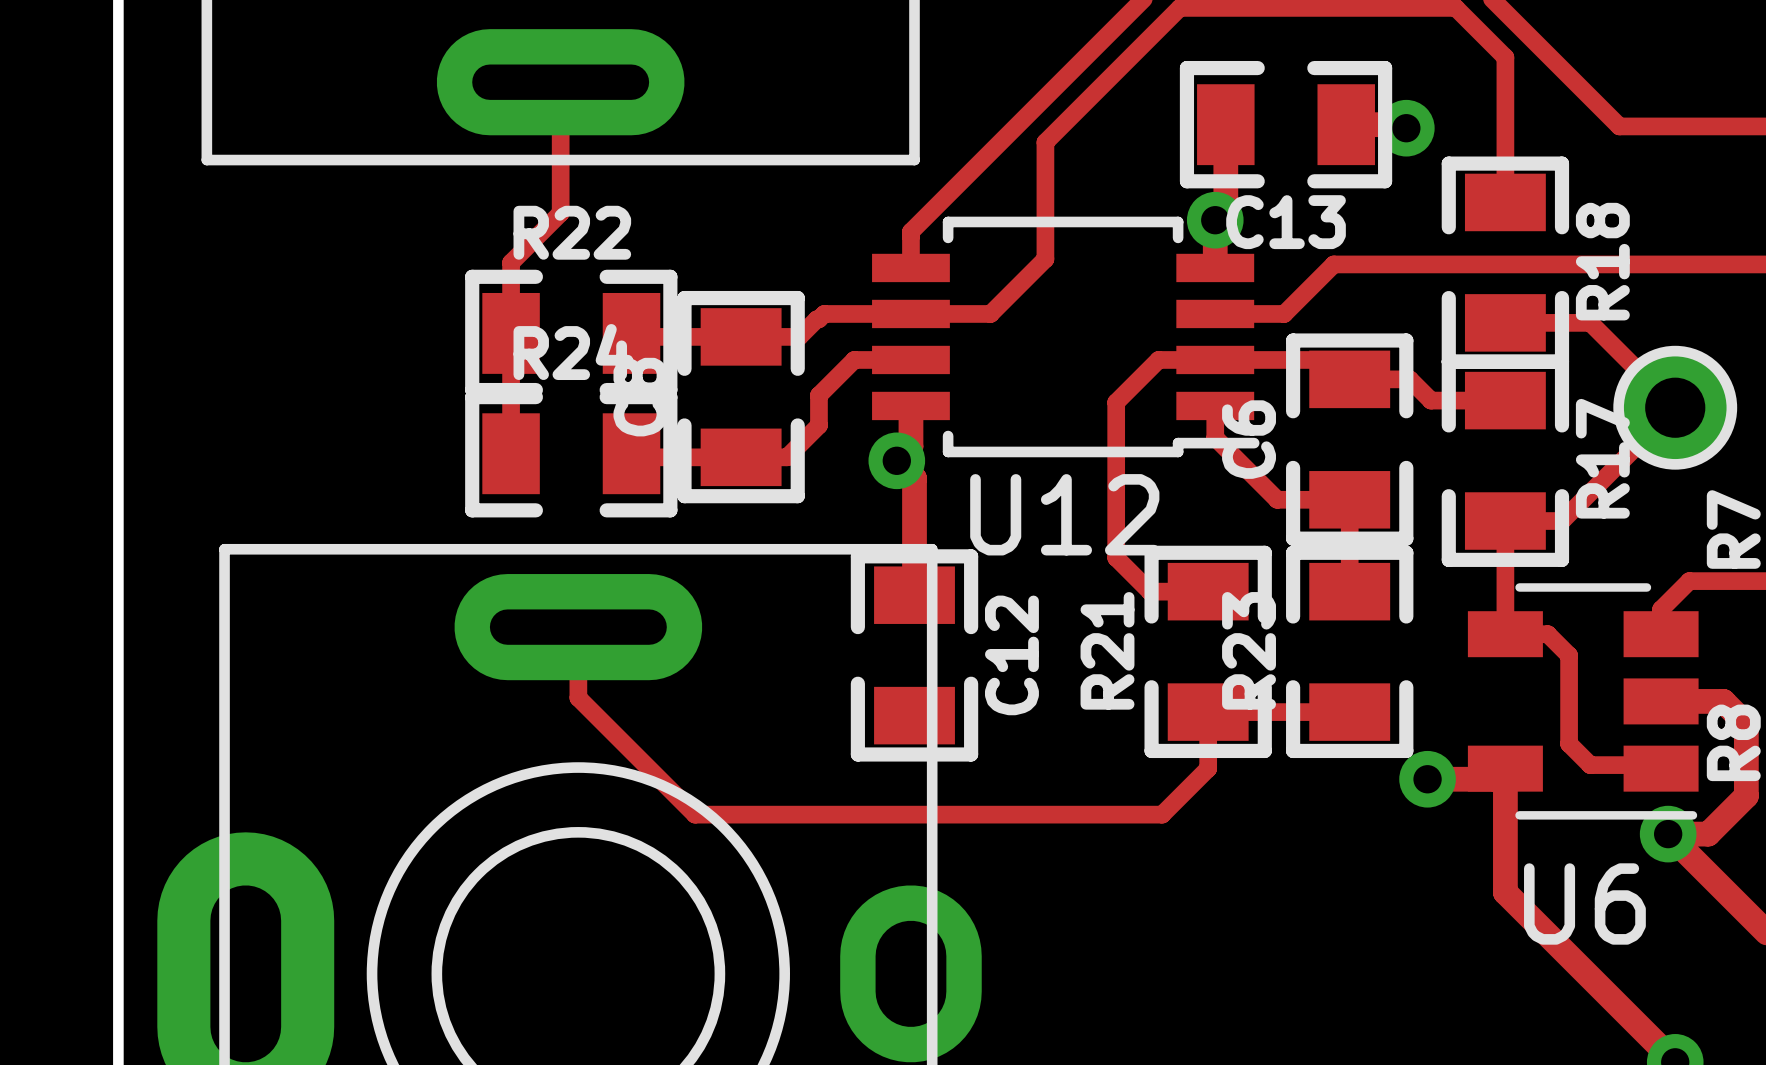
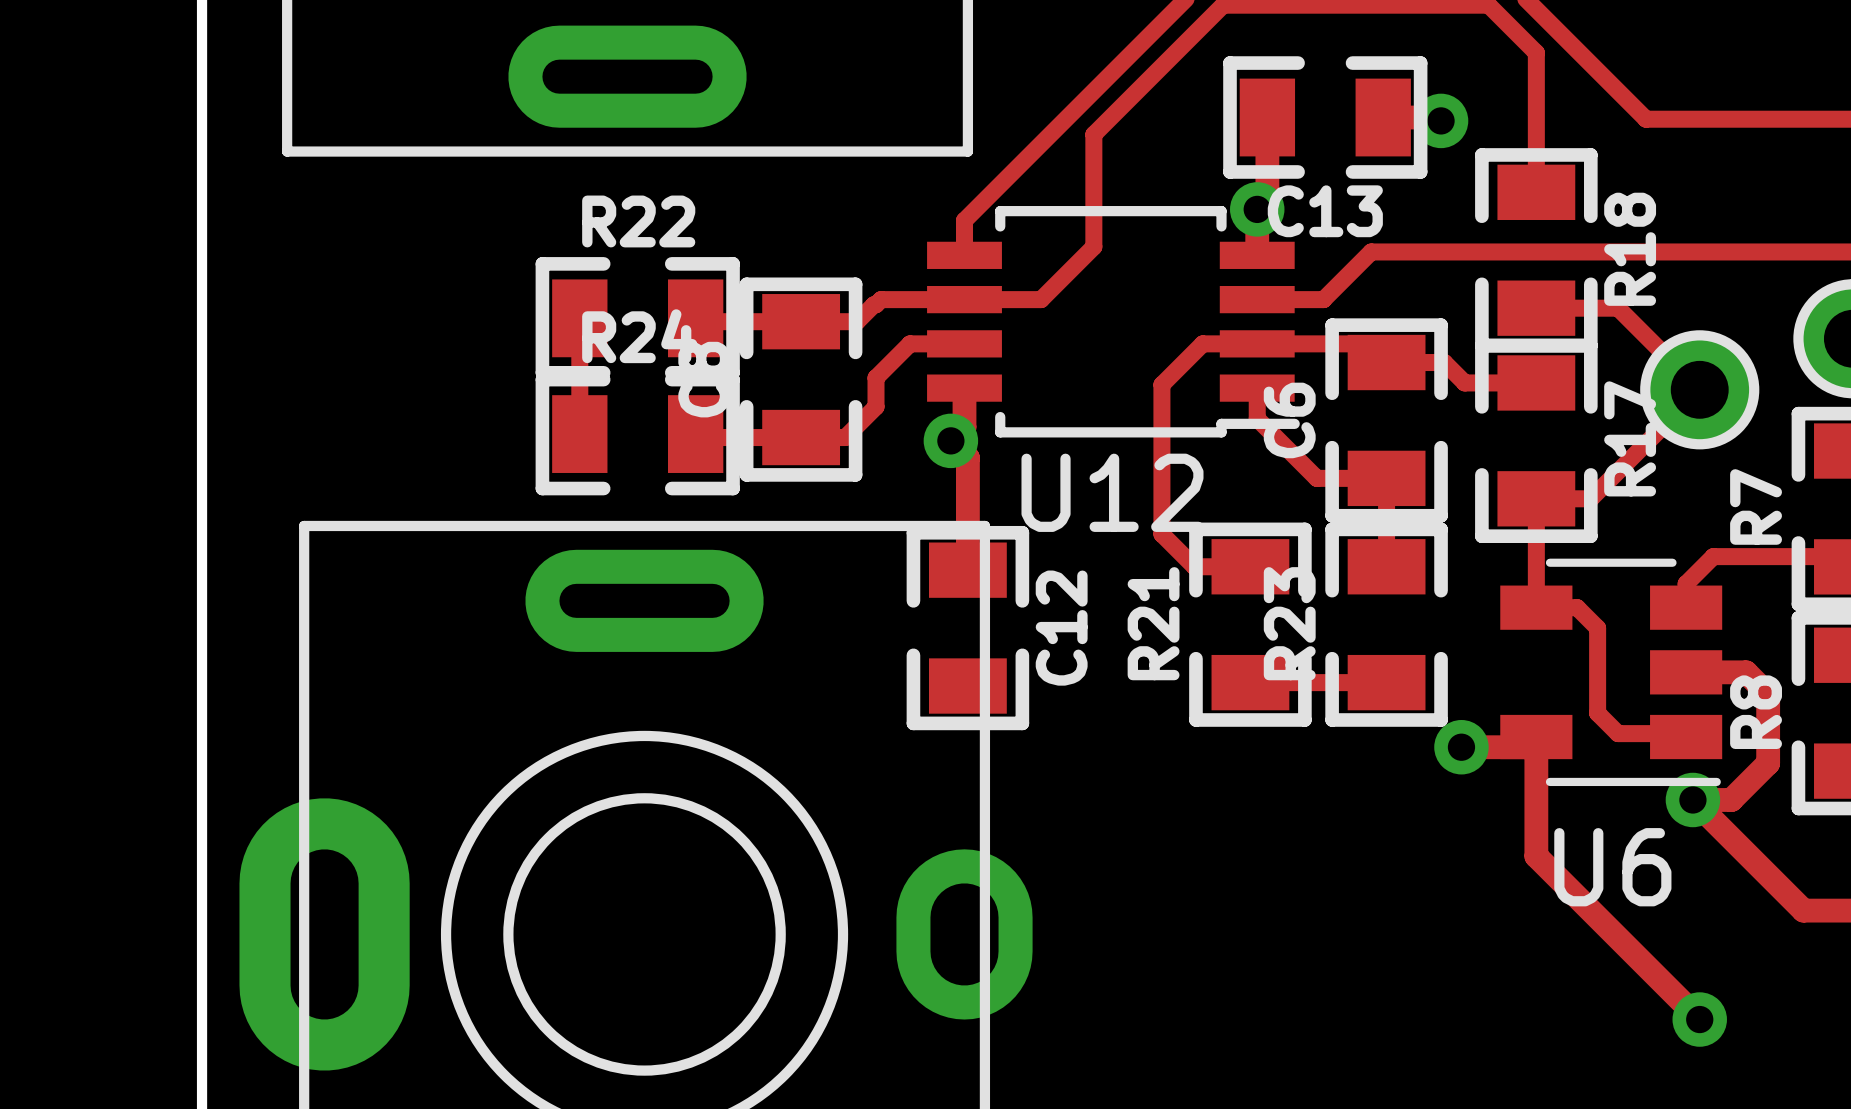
track: (560, 82) (560, 213) (511, 262) (511, 333) -> none
track: (578, 627) (578, 697) (695, 814) (1162, 814) (1208, 768) (1208, 712) -> none

